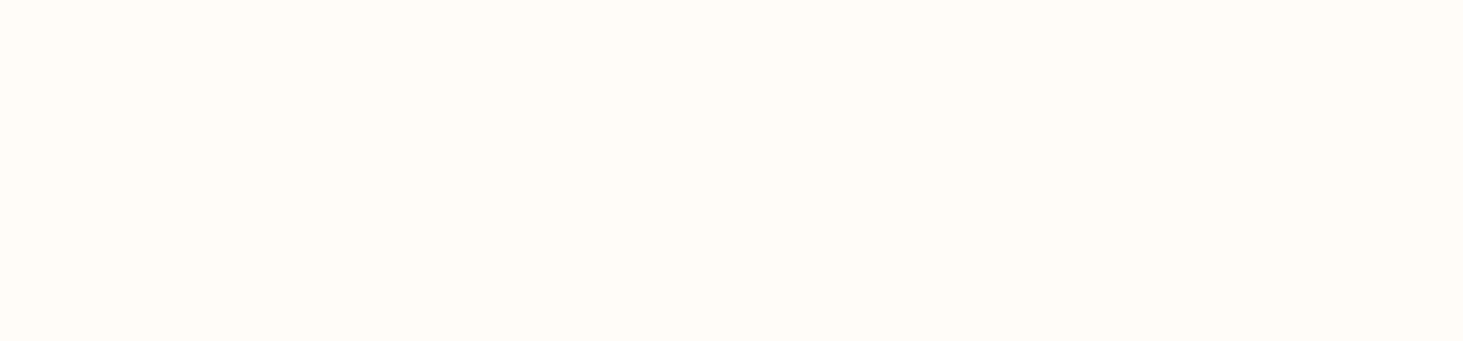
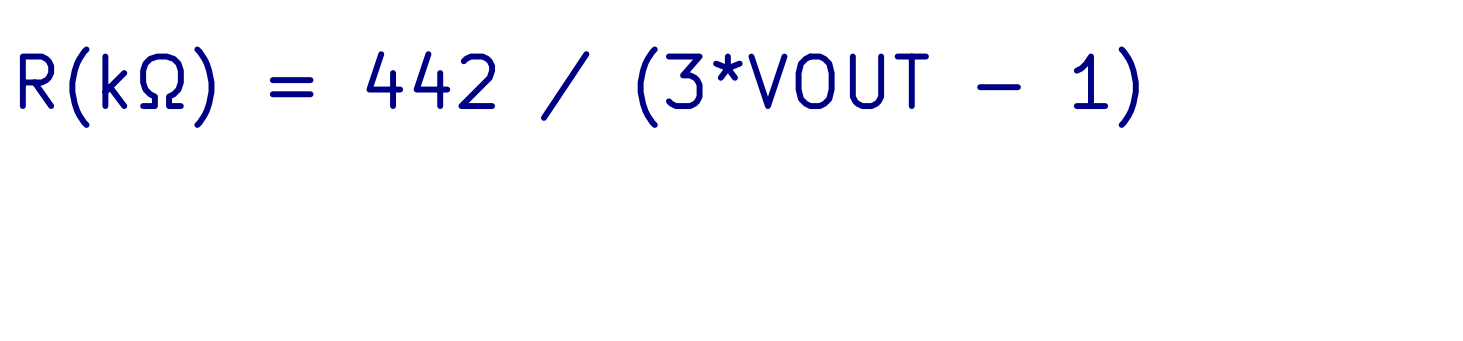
text: none -> R(kΩ) = 442 / (3*VOUT - 1) (579, 87)

